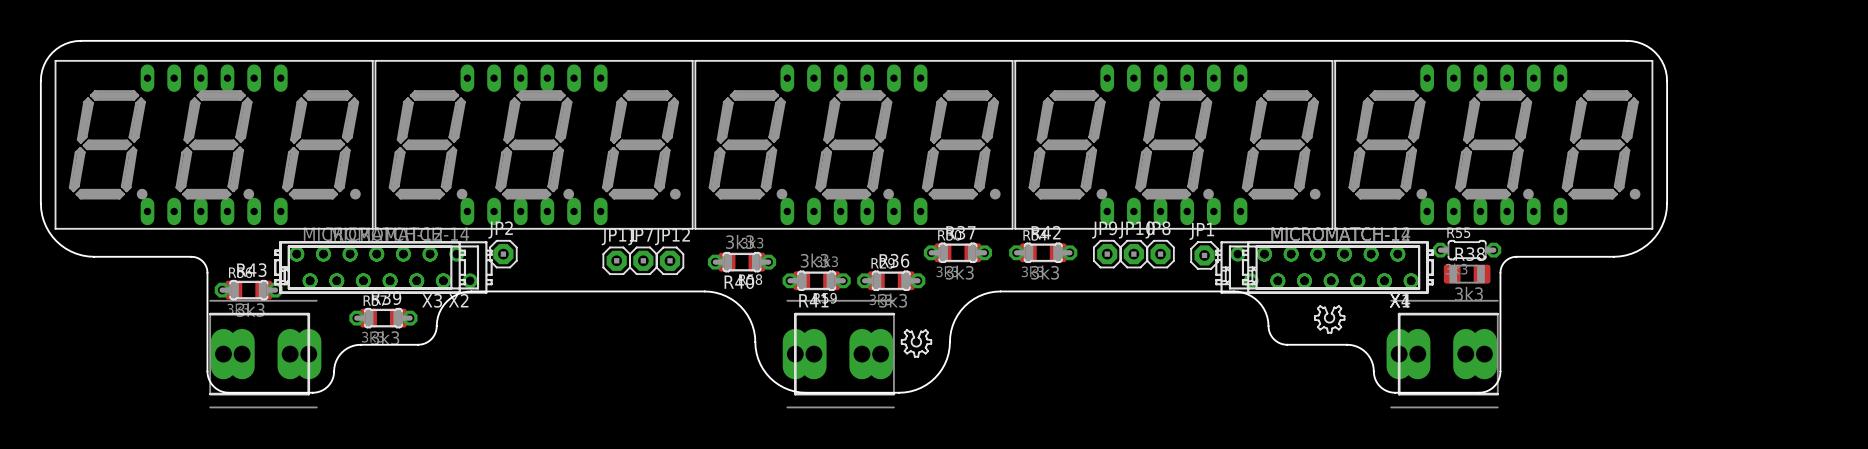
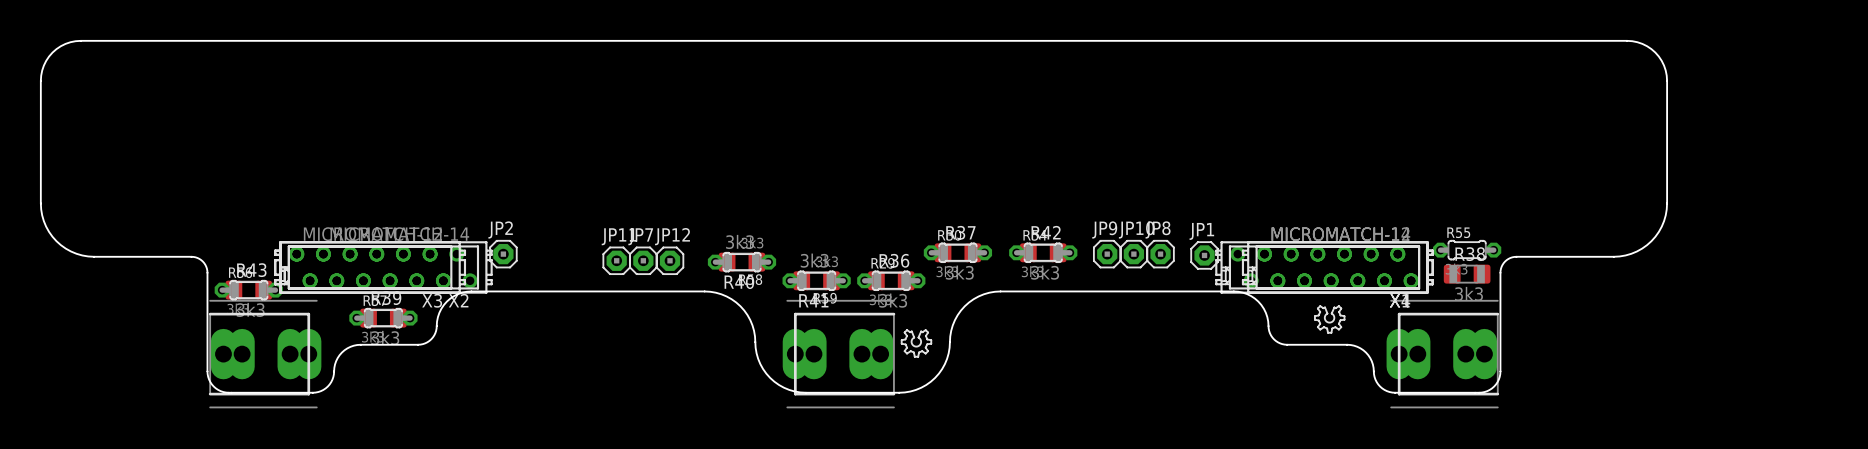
part: (214, 144) -> none
part: (534, 144) -> none
part: (853, 144) -> none
part: (1173, 144) -> none
part: (1493, 144) -> none

